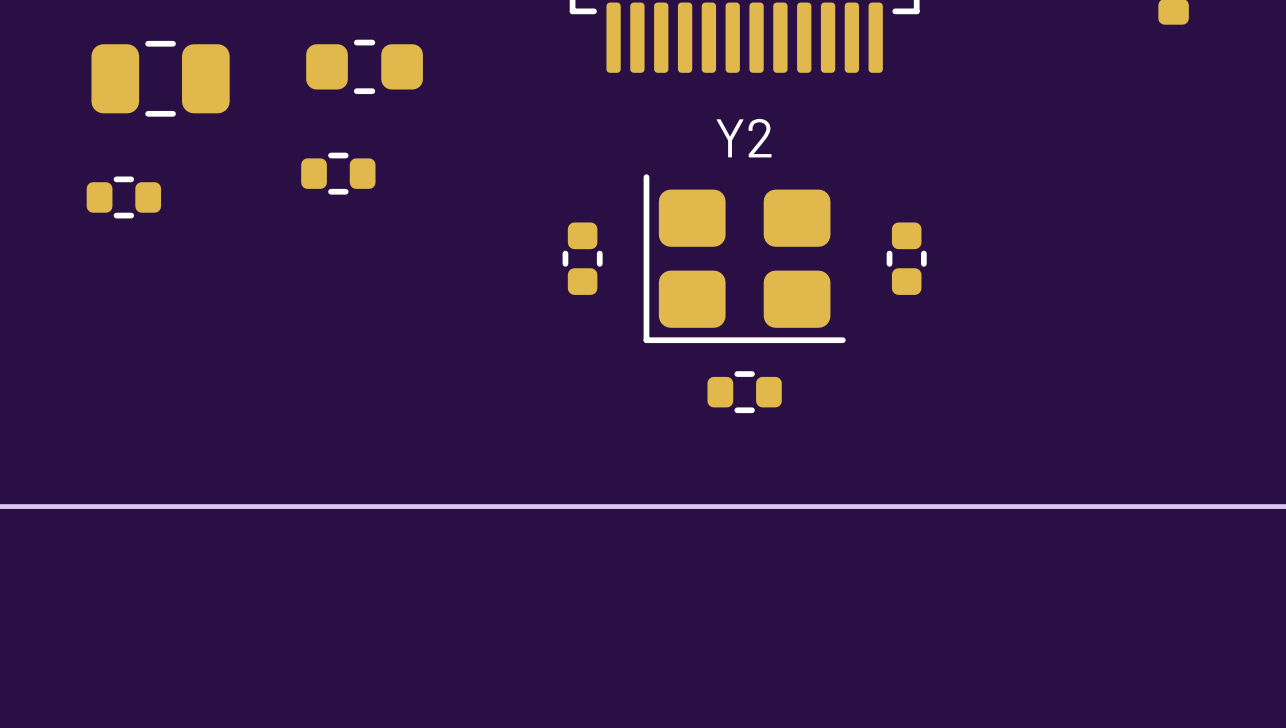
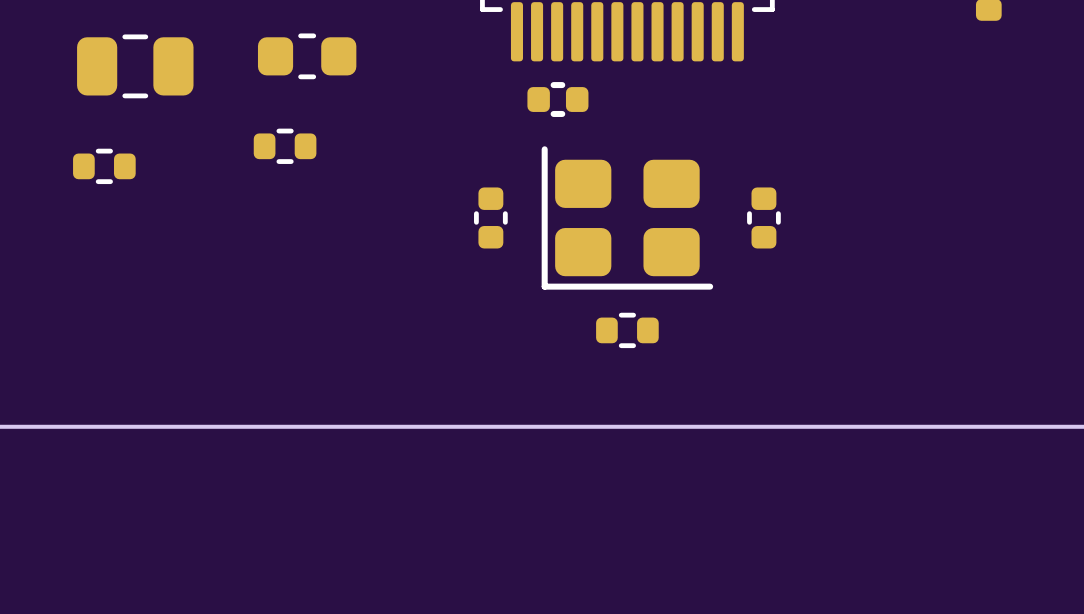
part: none -> (557, 99)
Y2: (744, 258) -> none
part: none -> (627, 217)

